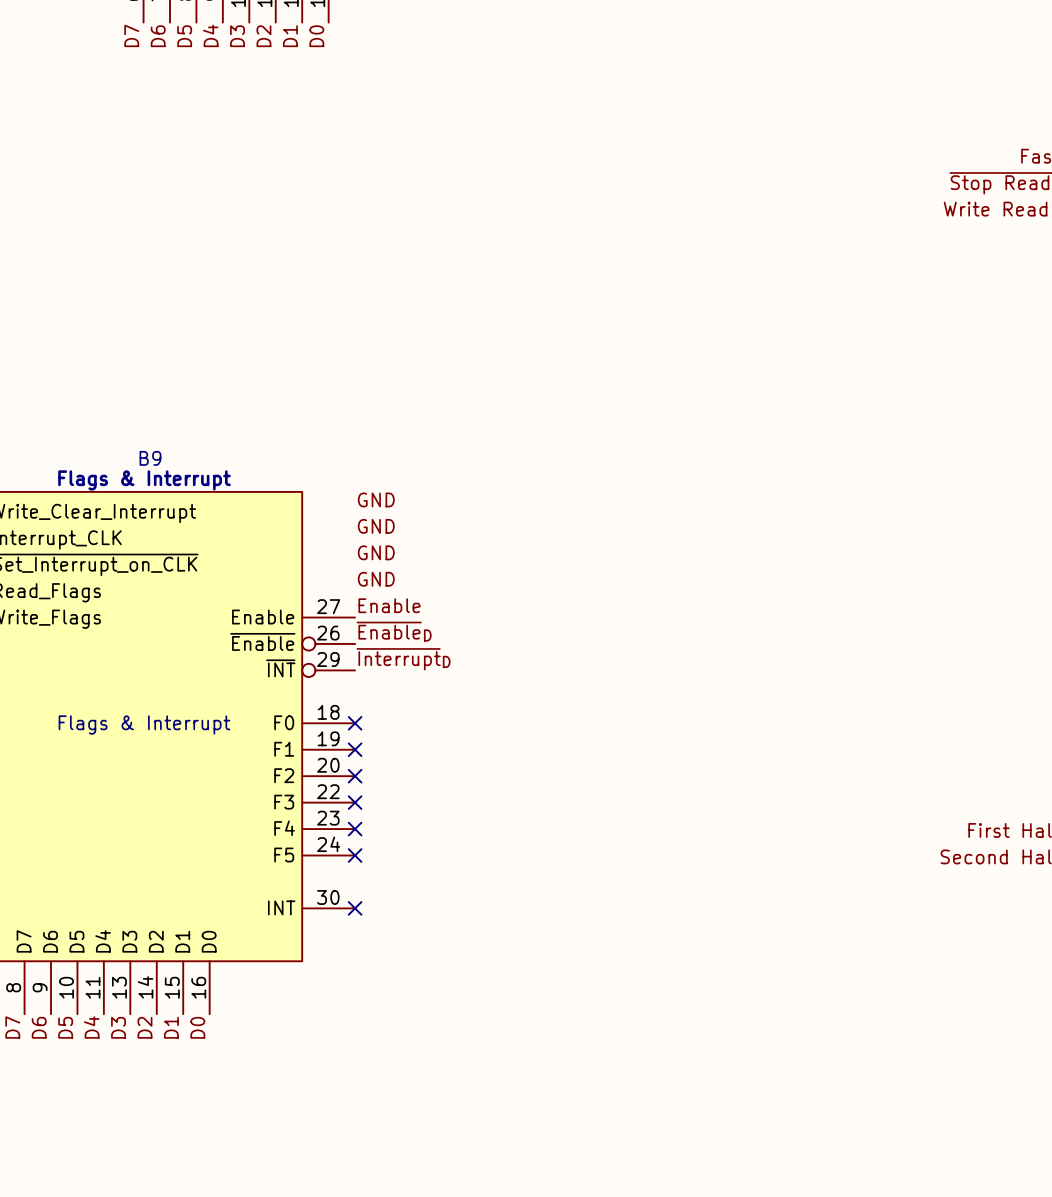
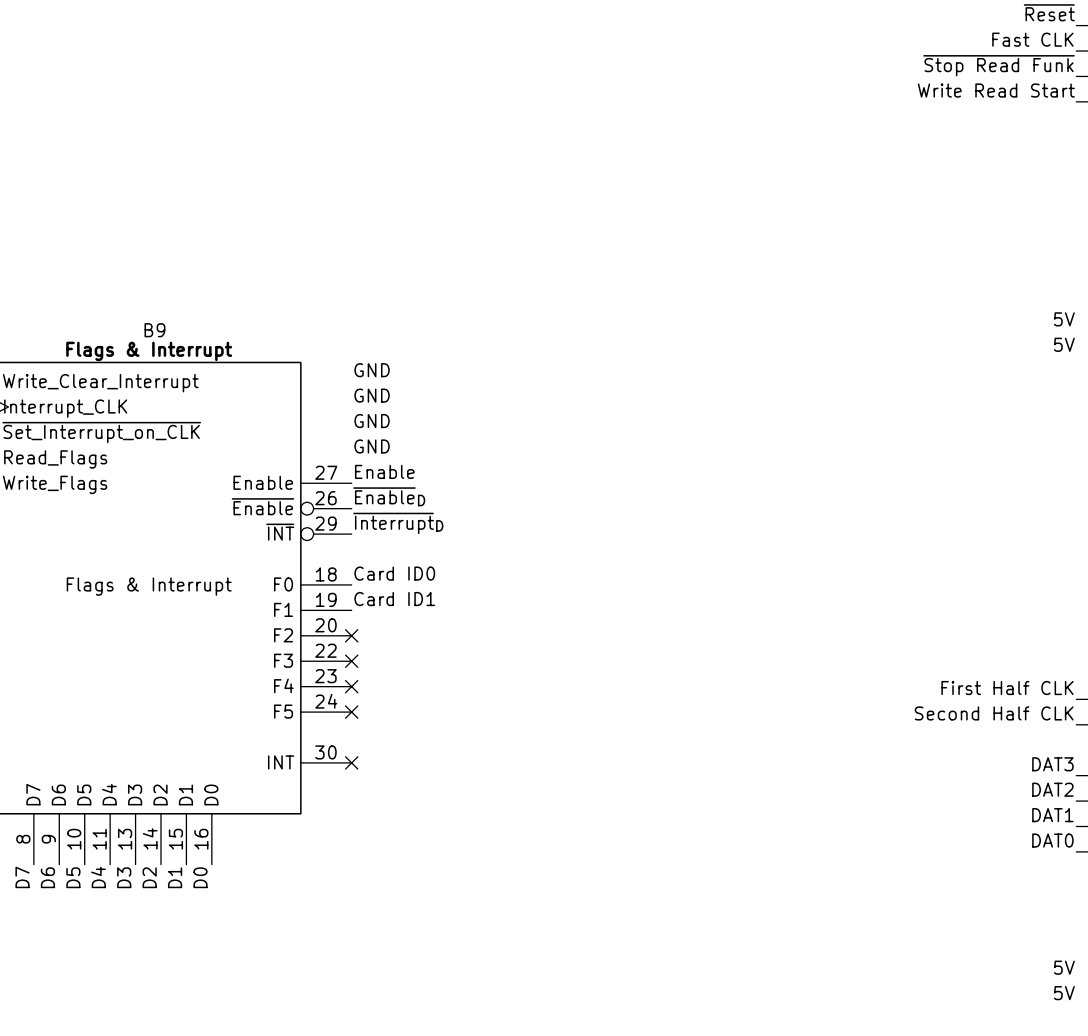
label: none -> Card ID0 (394, 573)
no-connect mark: (355, 723) -> none
label: none -> Card ID1 (394, 599)
no-connect mark: (355, 749) -> none

